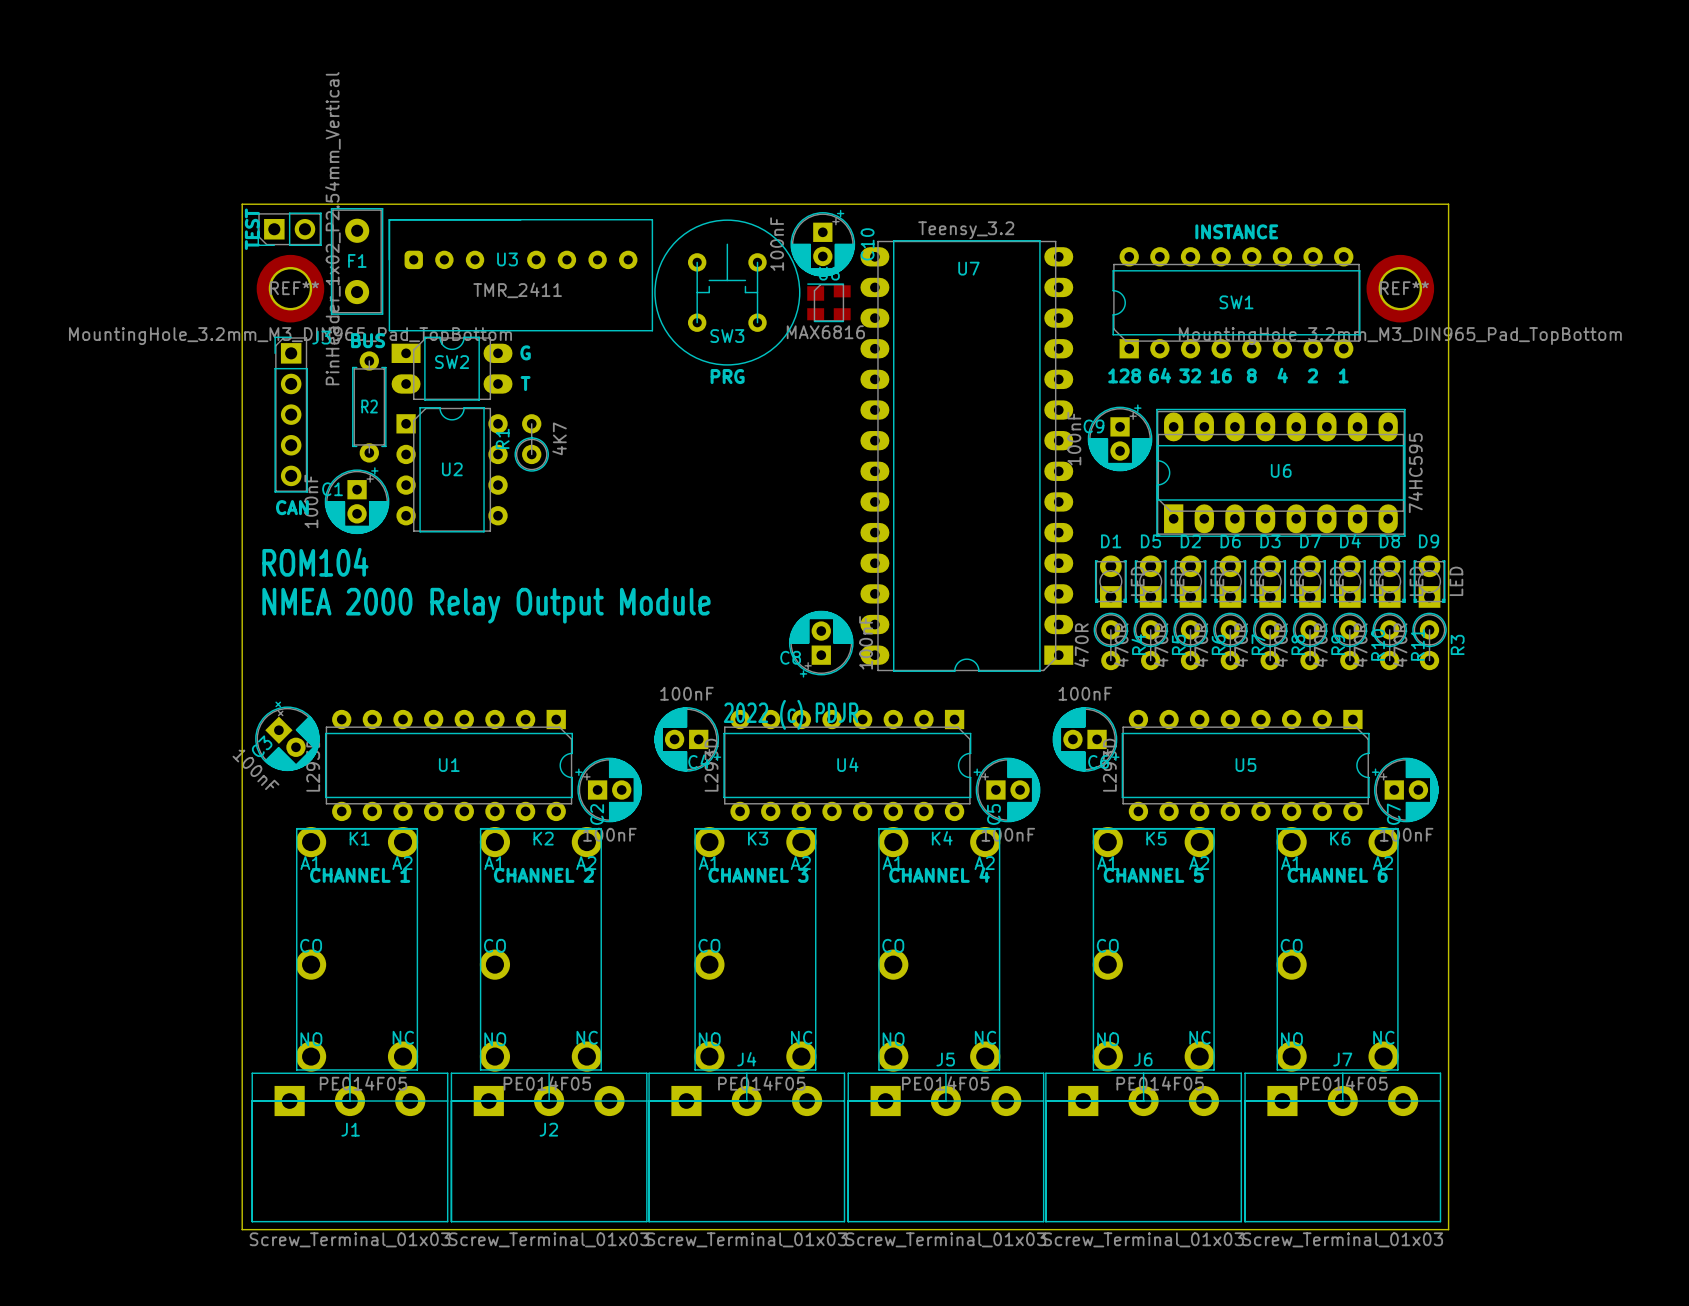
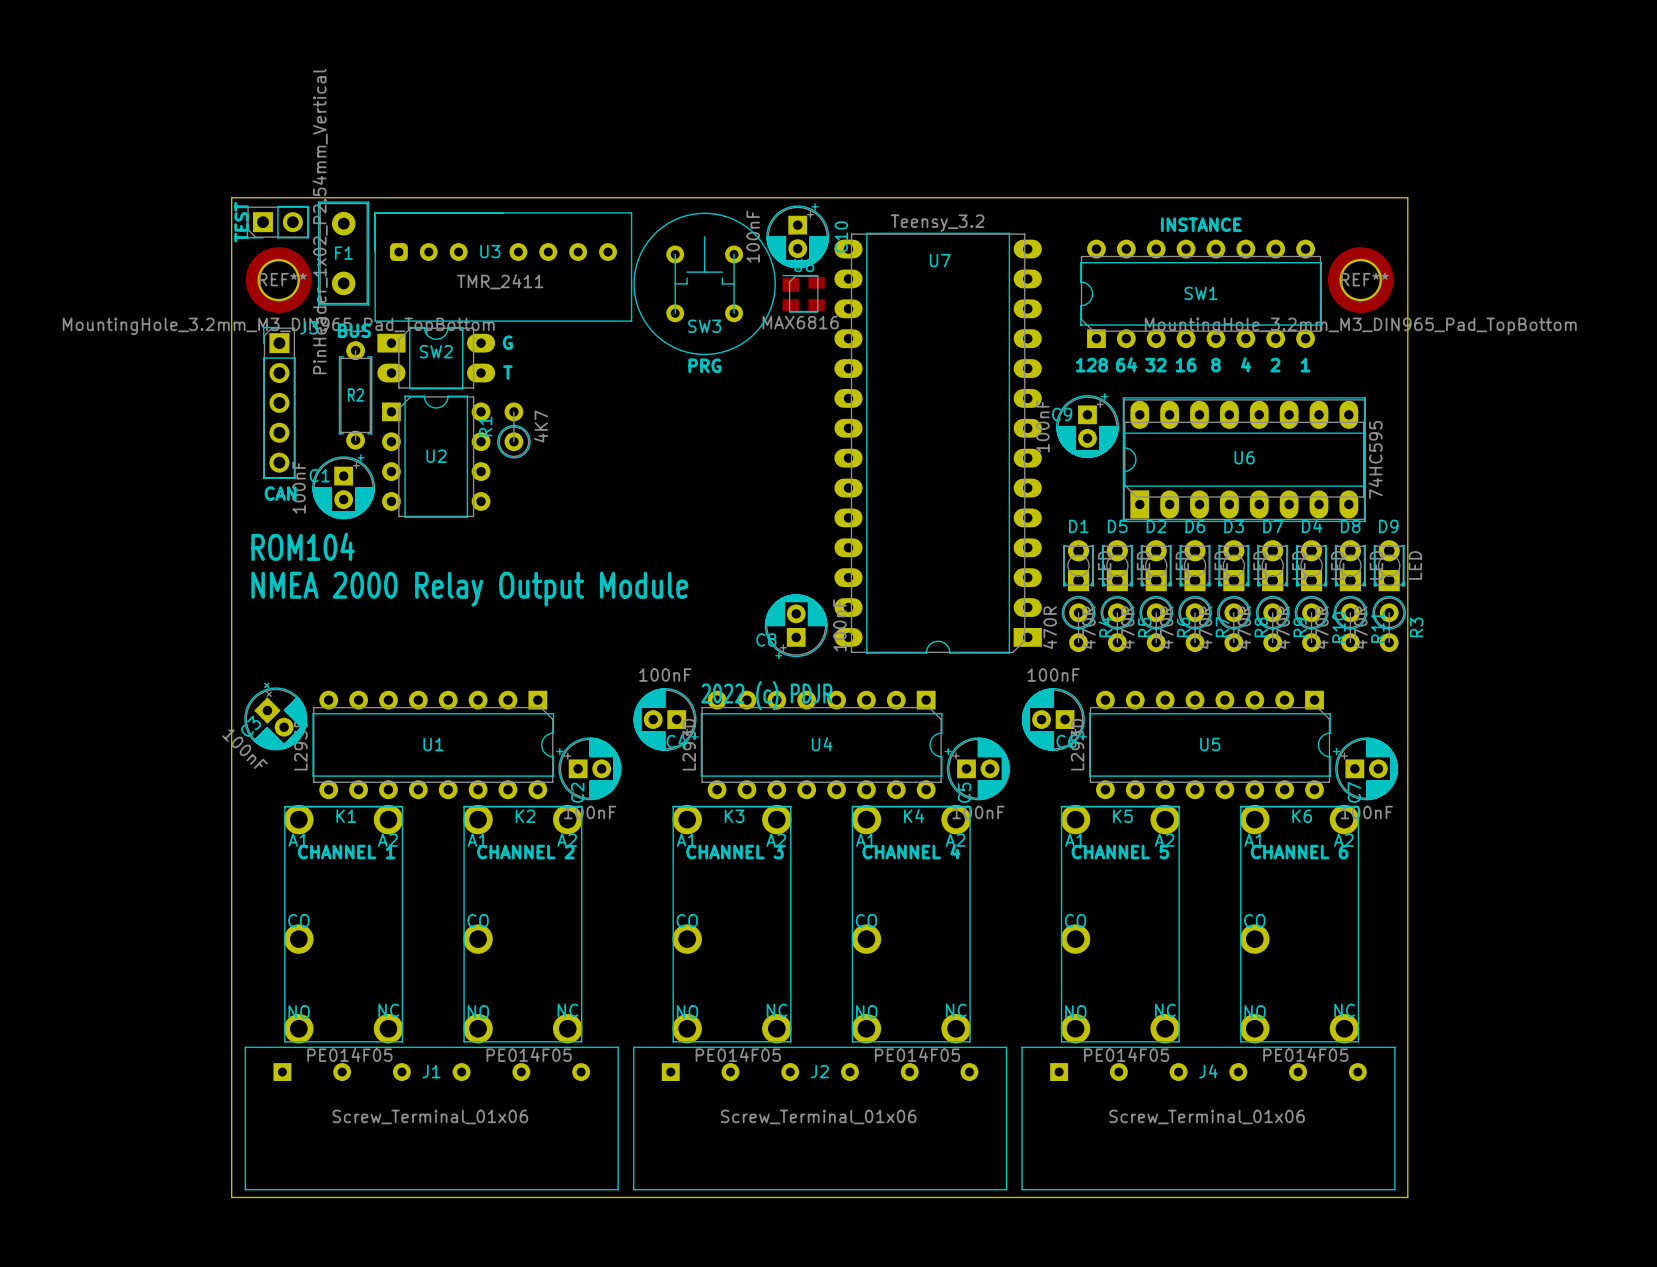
J4 name position: J4 (746, 1059) -> J4 (1208, 1071)
J1 footprint: [251, 1072, 449, 1223] -> [244, 1046, 619, 1191]
J2 footprint: [450, 1072, 648, 1223] -> [633, 1046, 1008, 1191]
J4 footprint: [648, 1072, 846, 1223] -> [1021, 1046, 1396, 1191]
J1 name position: J1 (350, 1129) -> J1 (431, 1071)
J2 name position: J2 (548, 1129) -> J2 (819, 1071)
J5: Screw_Terminal_01x03 (945, 1147) -> none
J6: Screw_Terminal_01x03 (1143, 1147) -> none
J7: Screw_Terminal_01x03 (1342, 1147) -> none
J1 value: Screw_Terminal_01x03 (349, 1239) -> Screw_Terminal_01x06 (430, 1116)
J2 value: Screw_Terminal_01x03 (549, 1239) -> Screw_Terminal_01x06 (818, 1116)
J4 value: Screw_Terminal_01x03 (746, 1239) -> Screw_Terminal_01x06 (1207, 1116)

